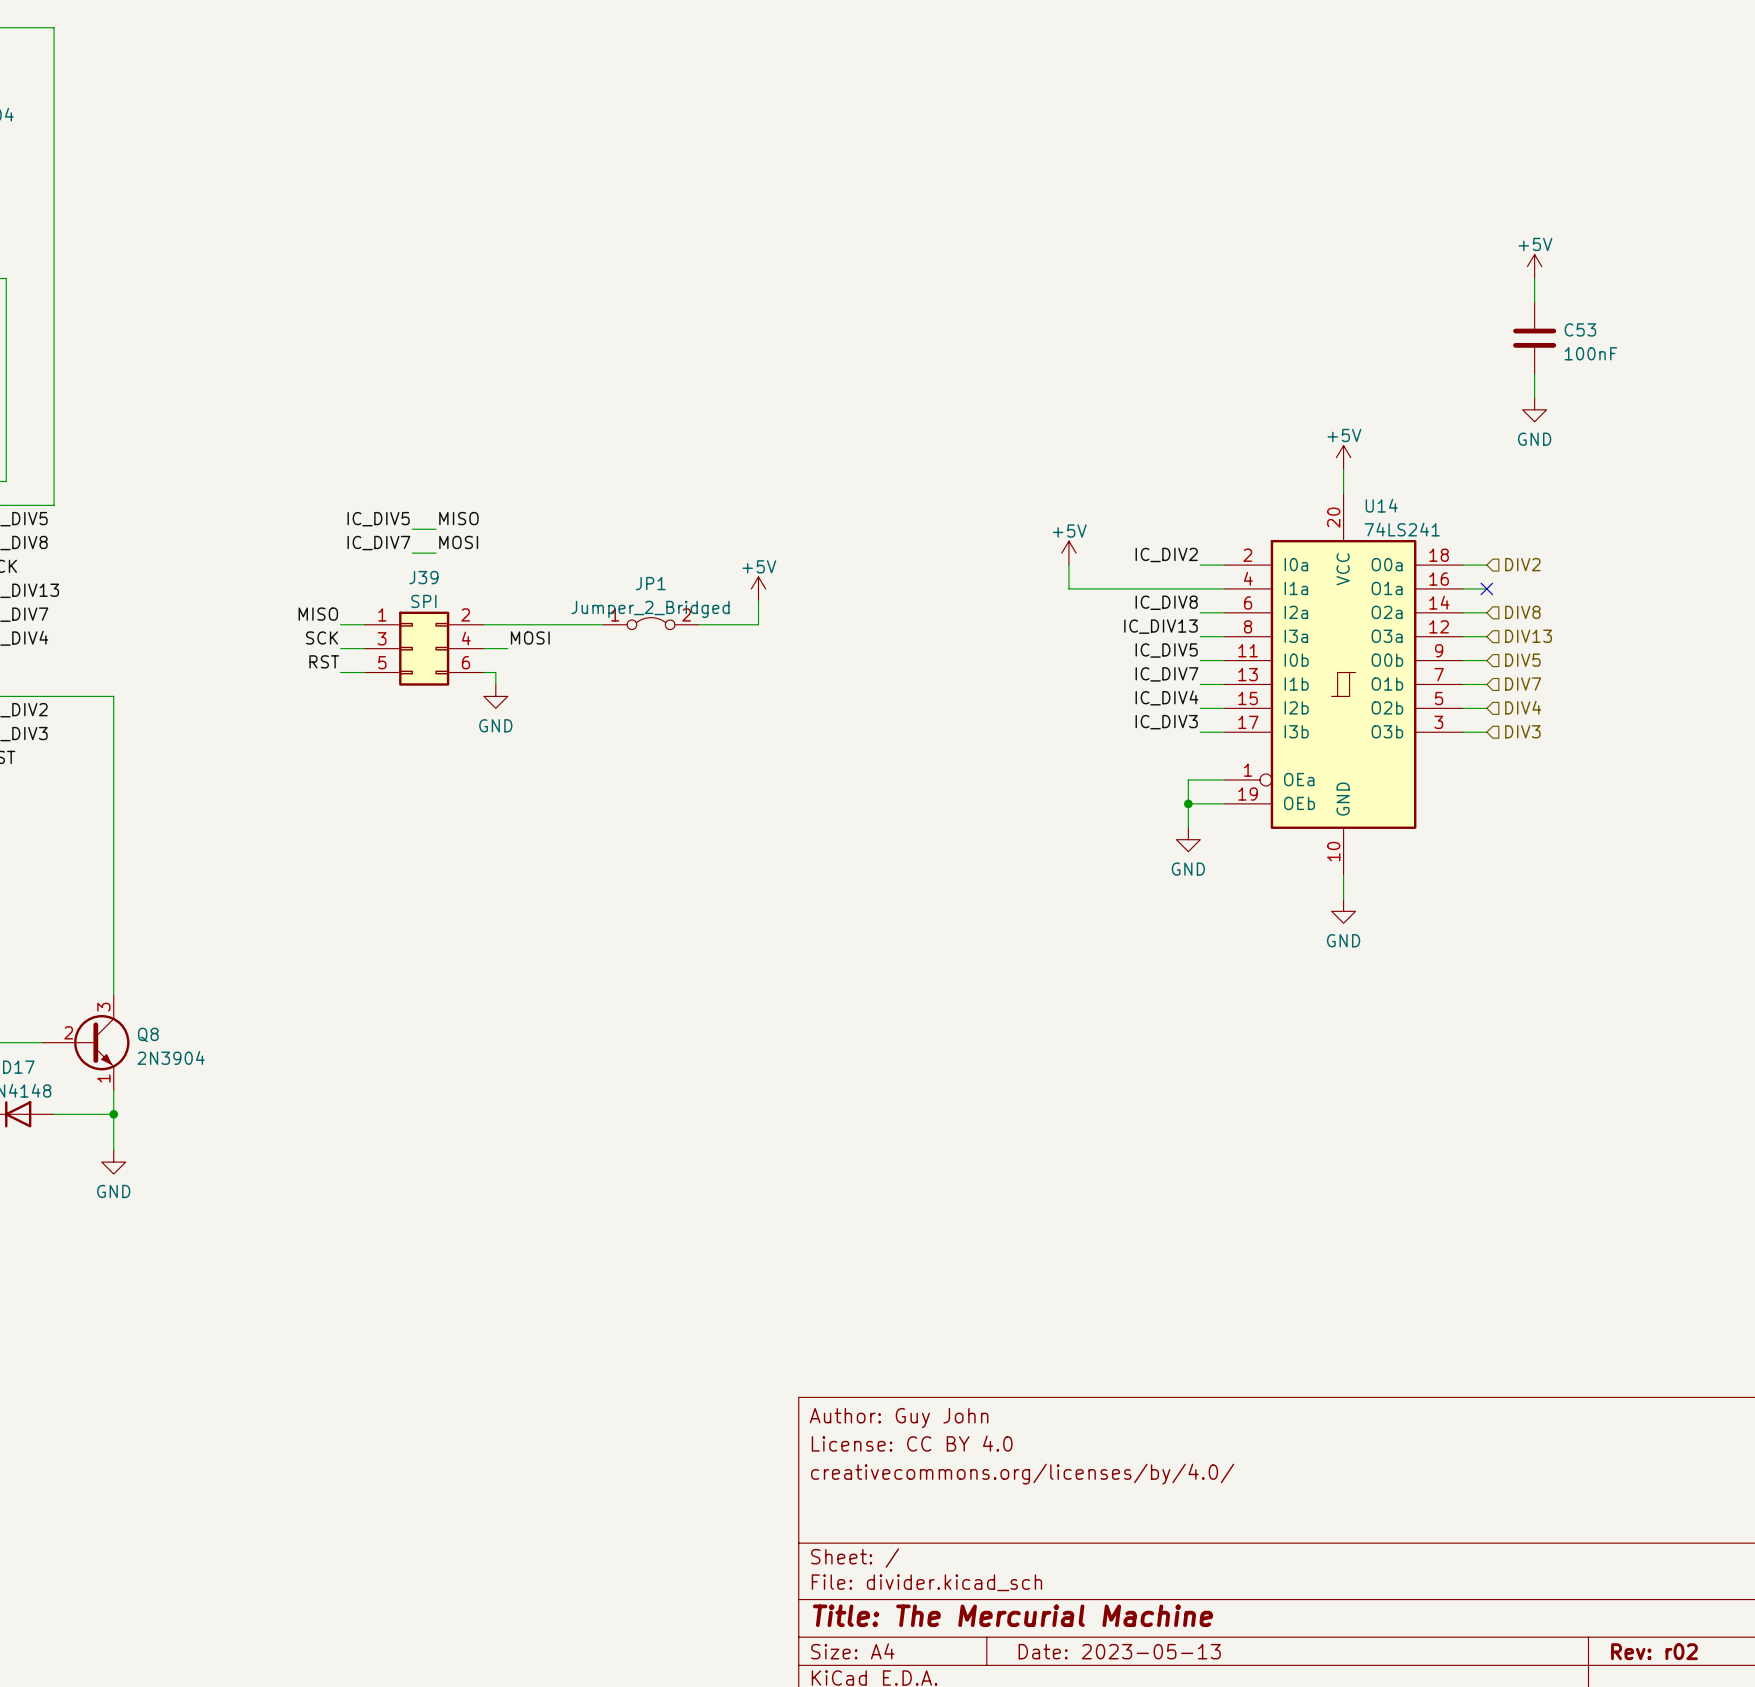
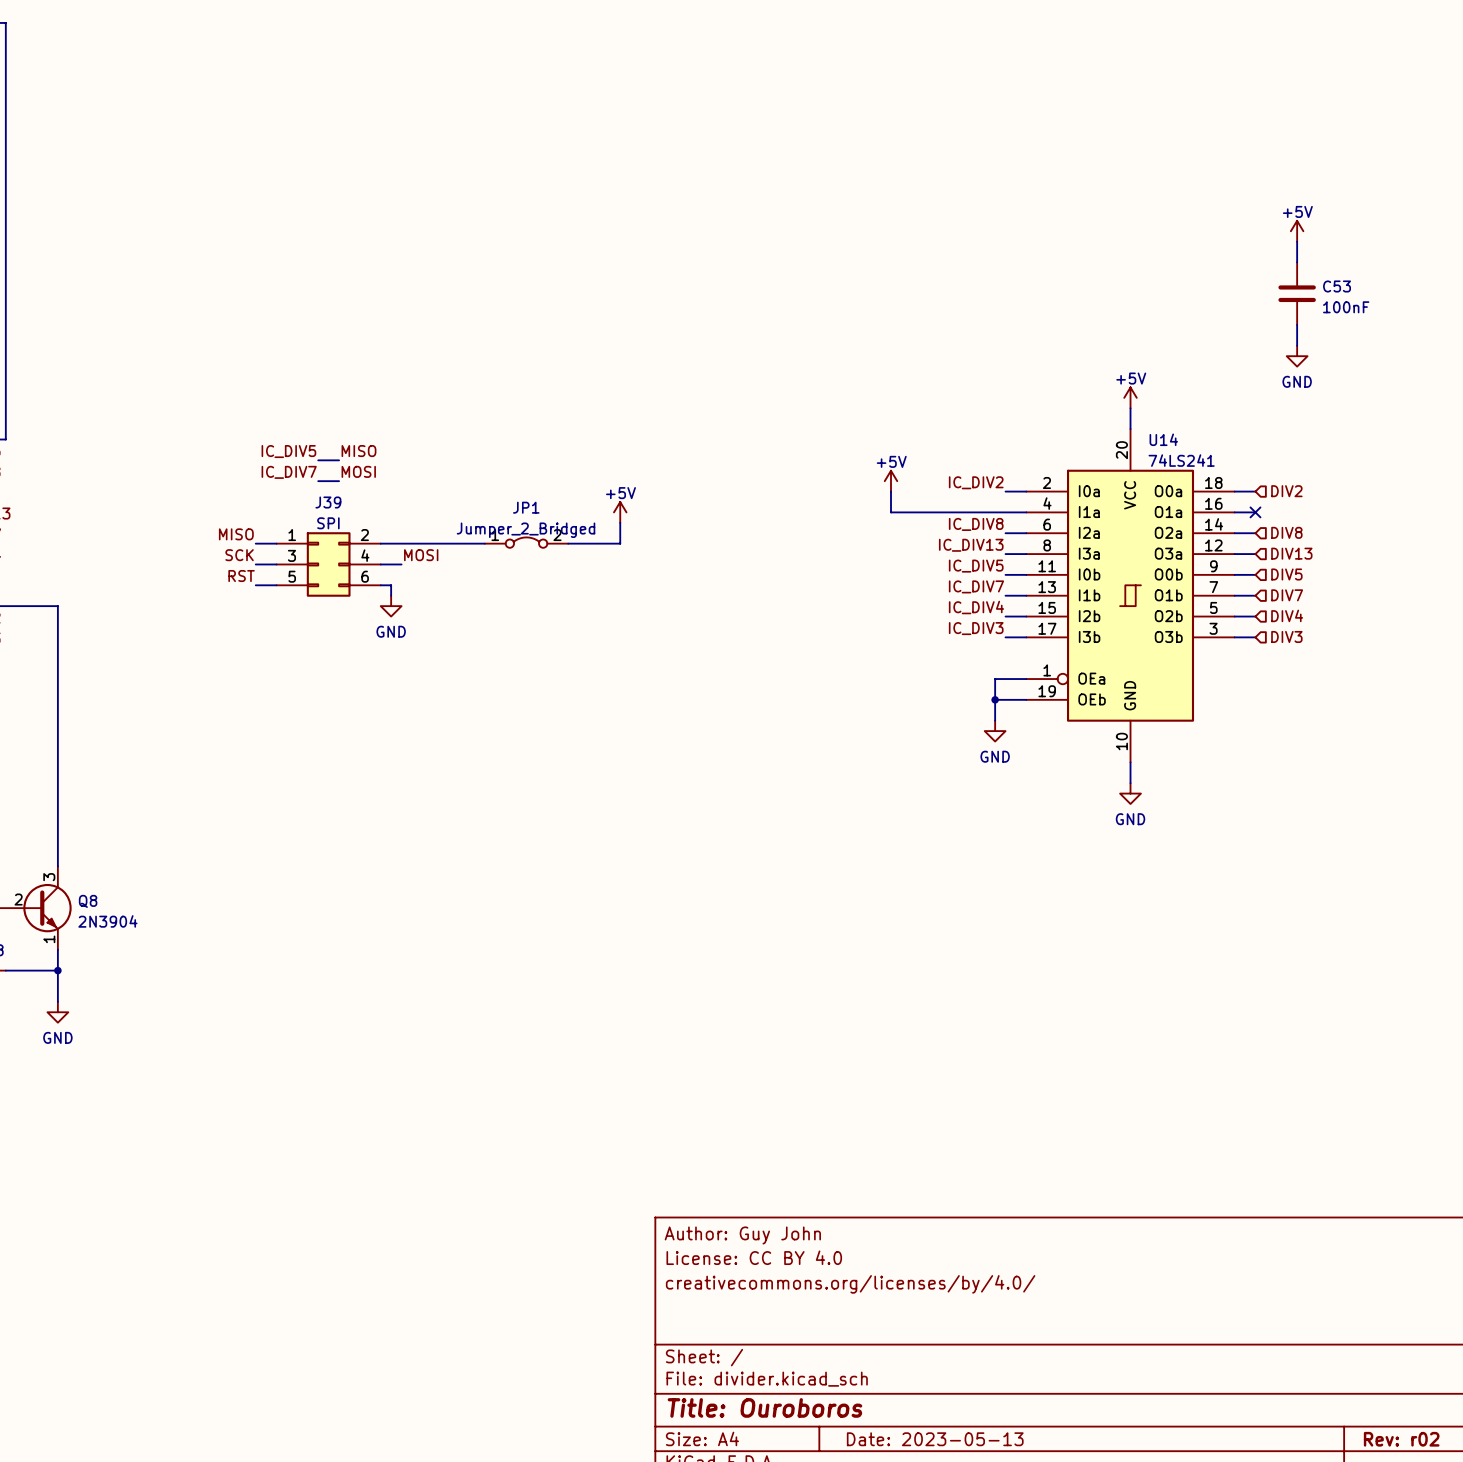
title block: Title: The Mercurial Machine (1012, 1615) -> Title: Ouroboros (764, 1407)

